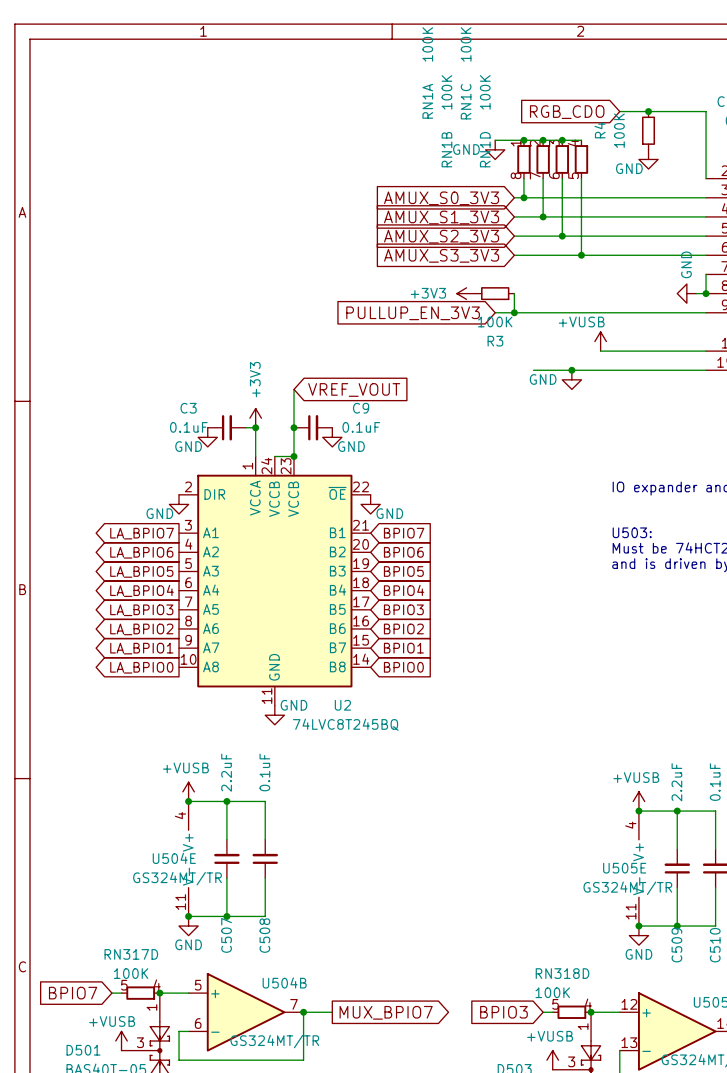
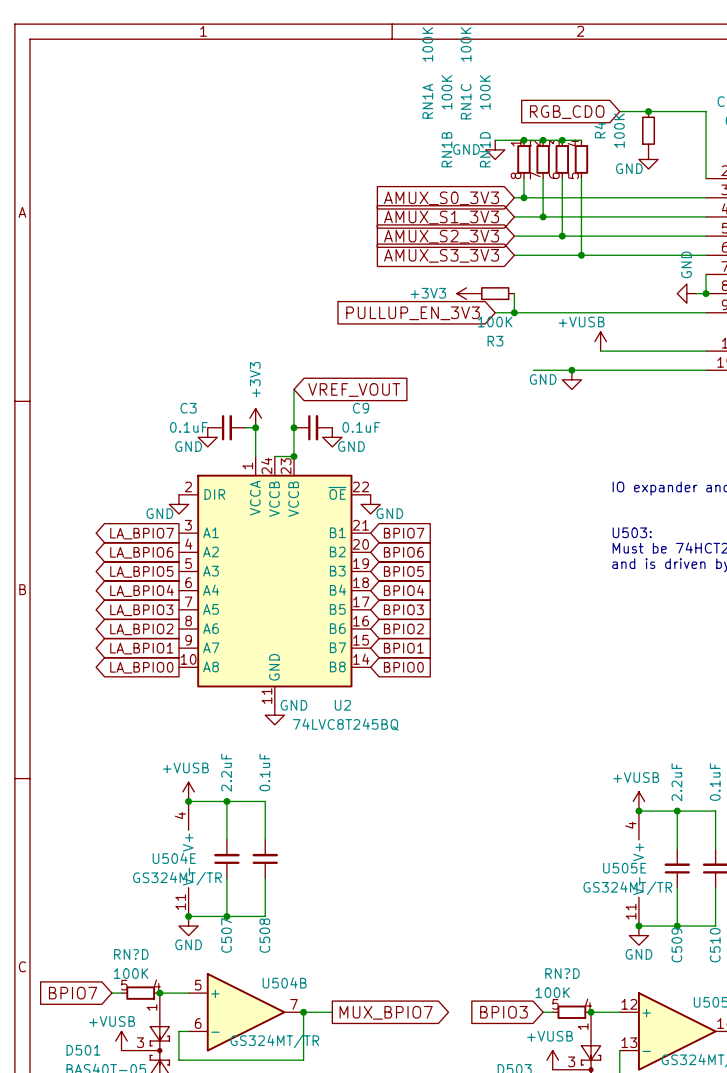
RN317D name: RN317D (131, 954) -> RN?D (131, 954)
RN318D name: RN318D (562, 973) -> RN?D (562, 973)

